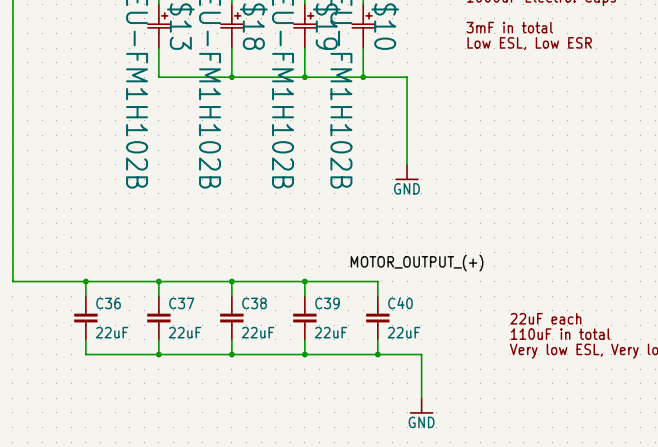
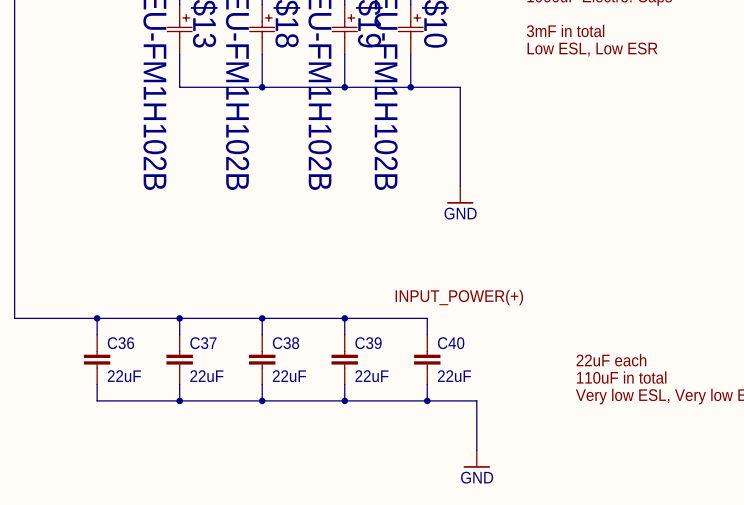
label: MOTOR_OUTPUT_(+) (417, 263) -> INPUT_POWER(+) (459, 297)

